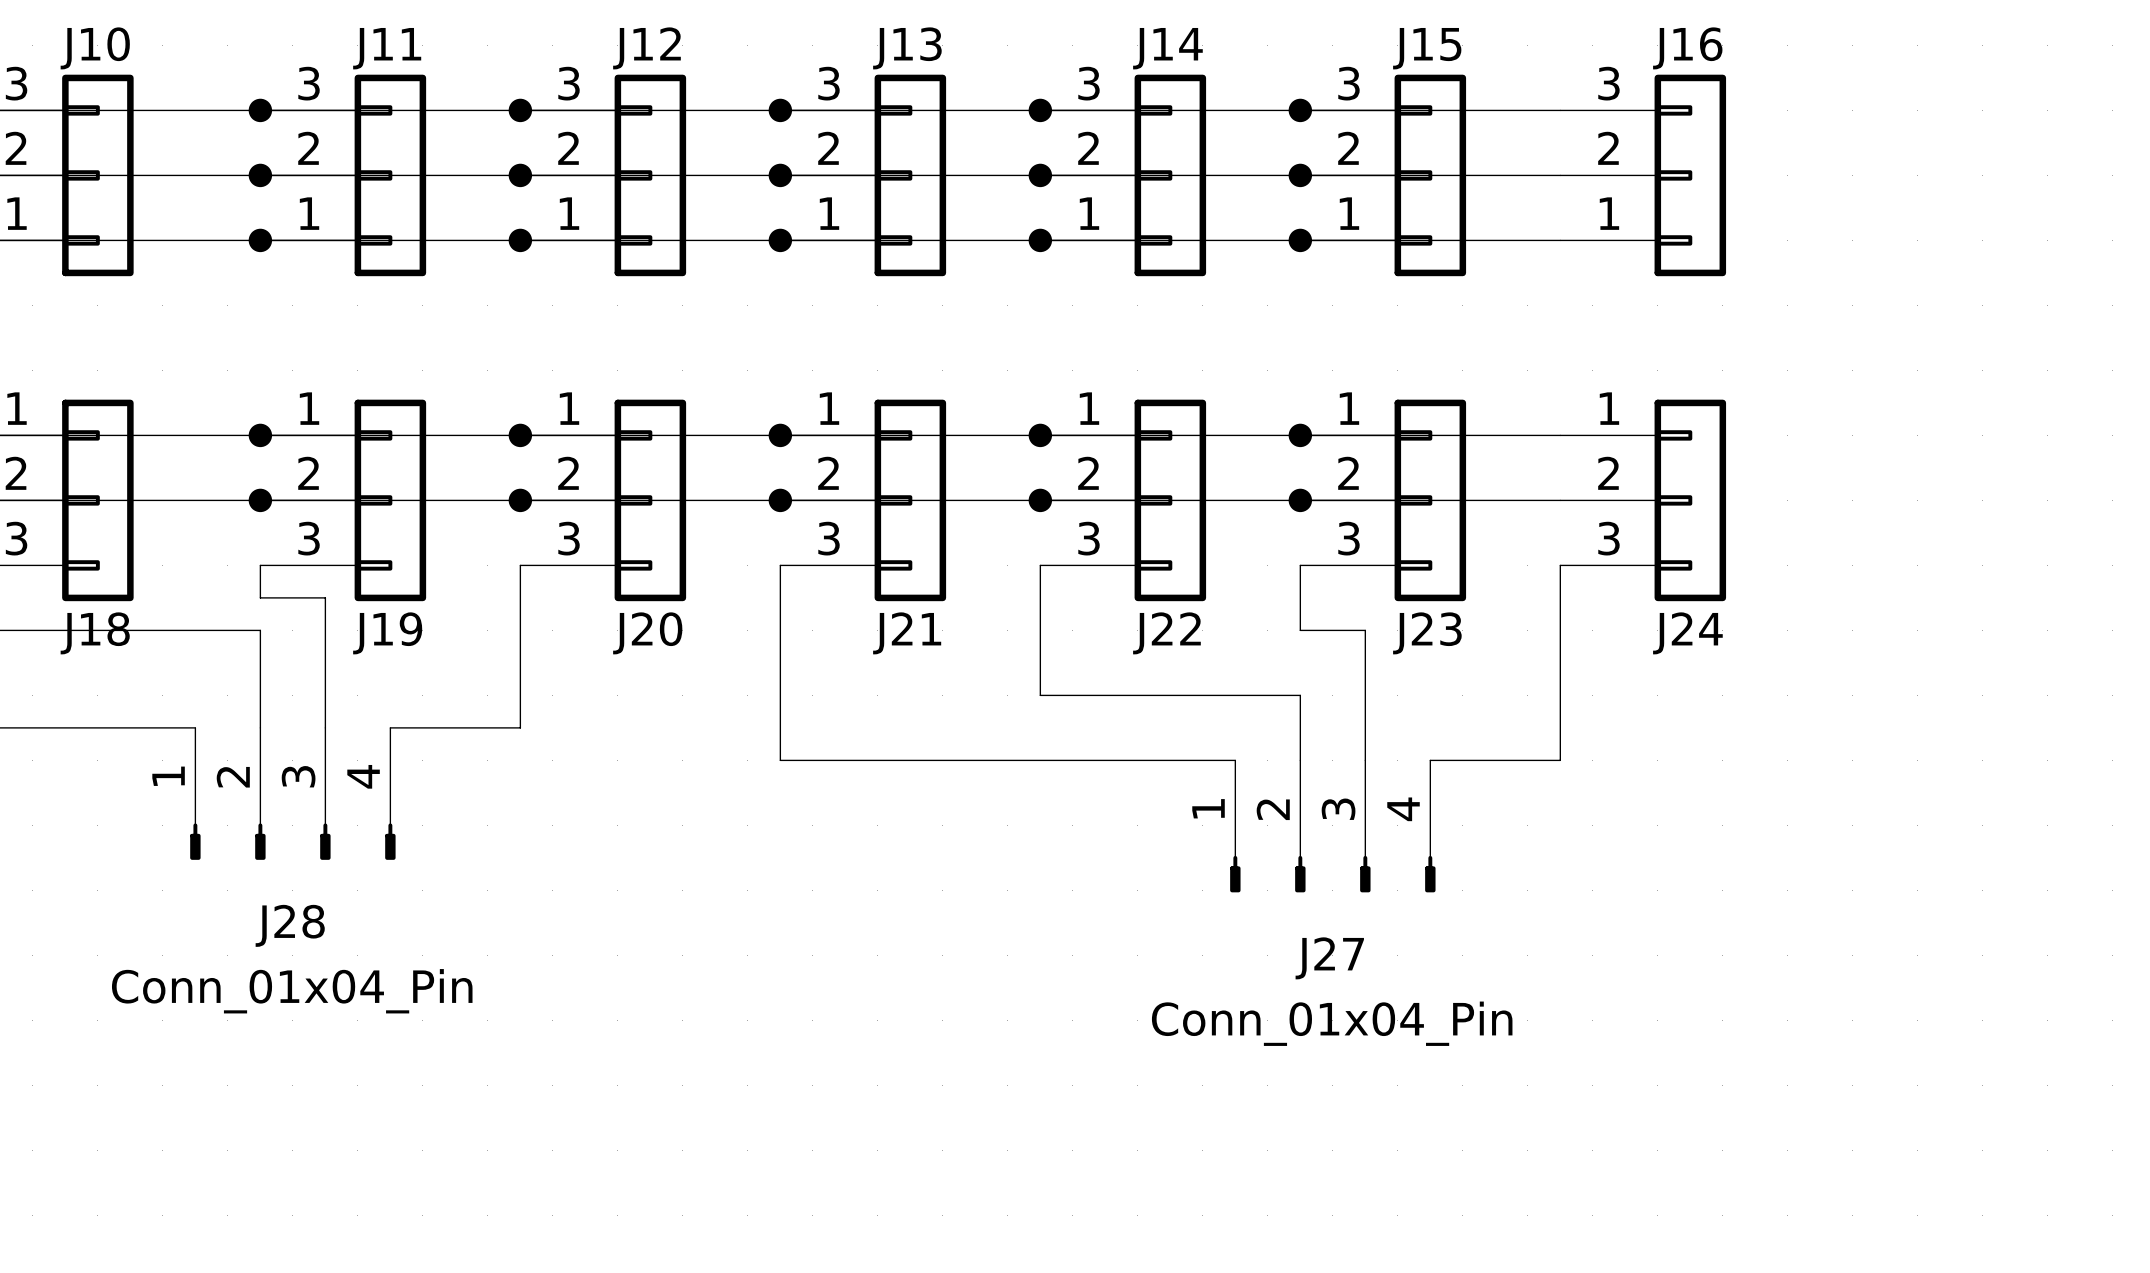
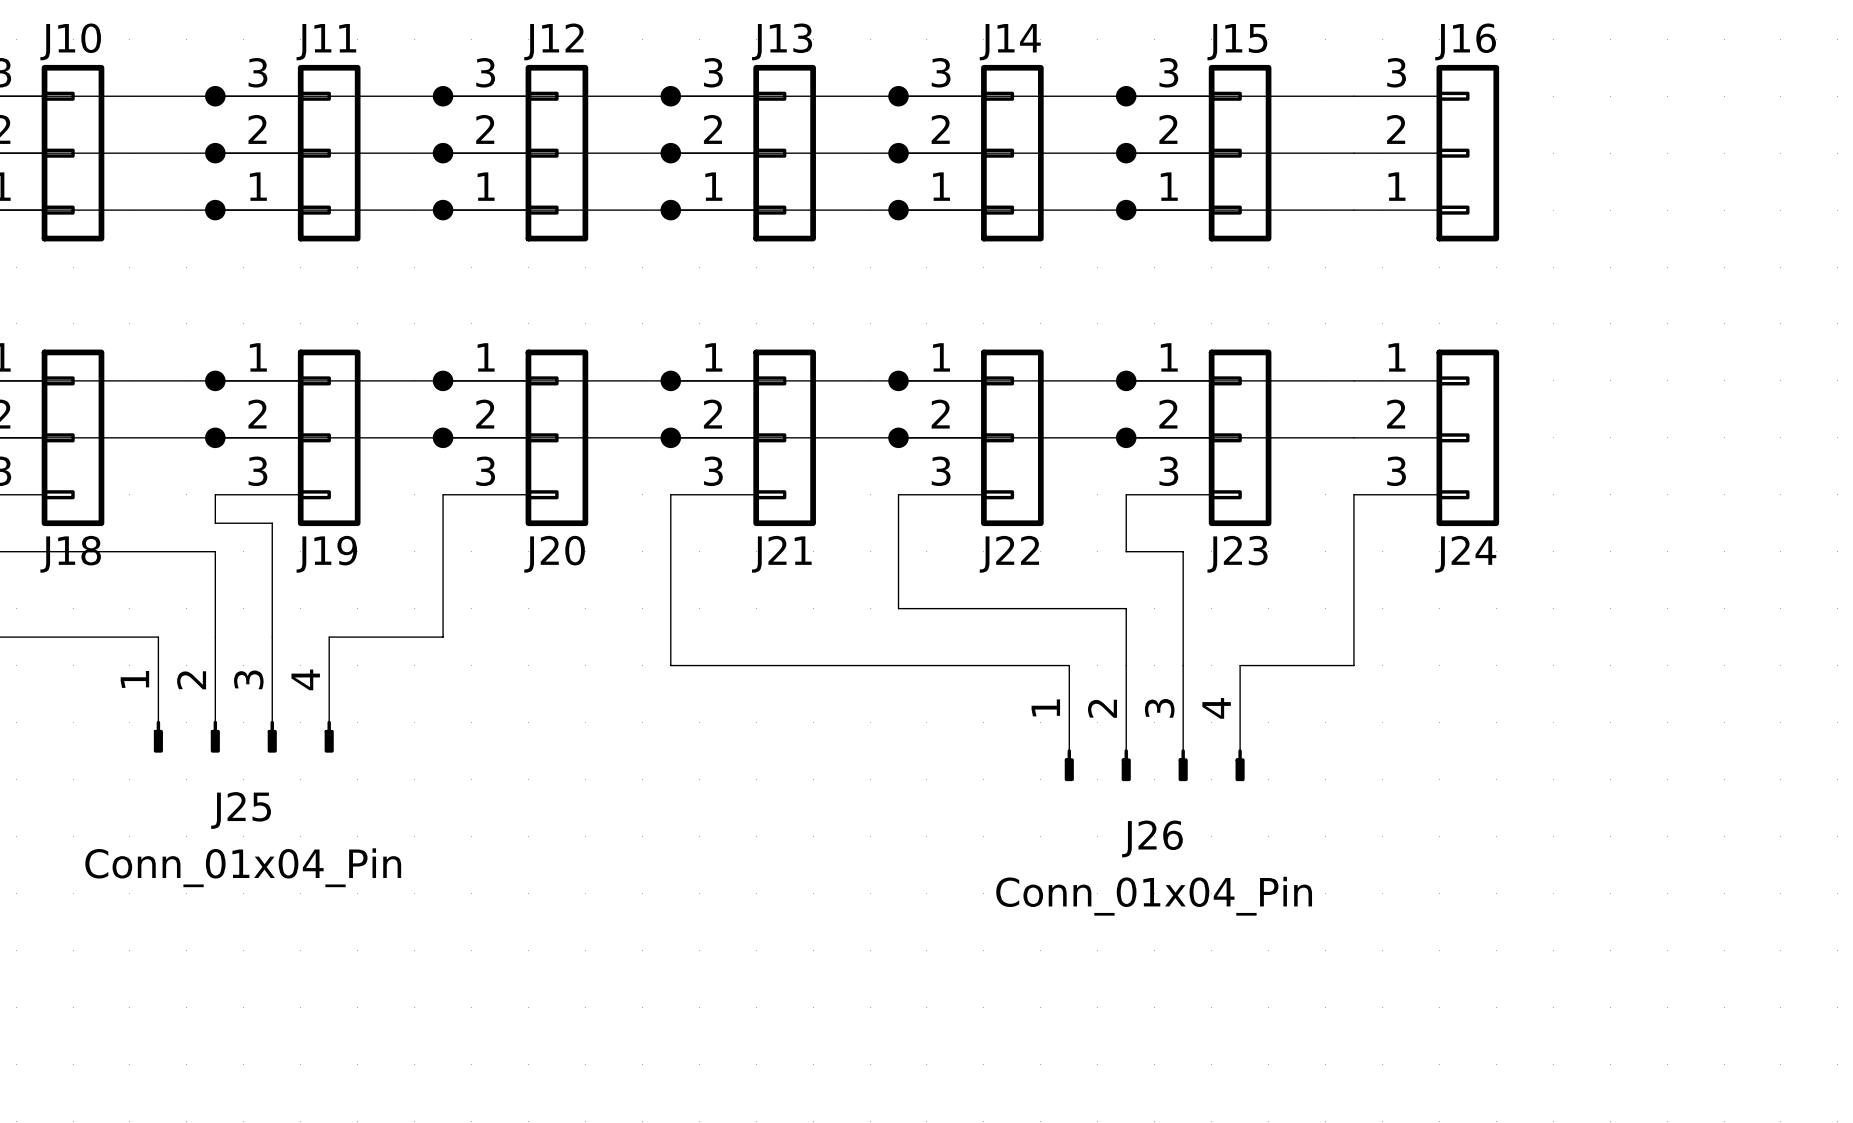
J28 name: J28 (290, 925) -> J25 (241, 810)
J27 name: J27 (1329, 958) -> J26 (1152, 838)

